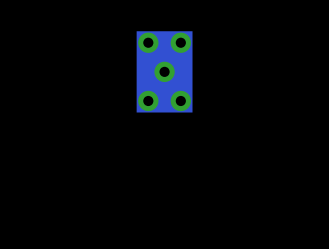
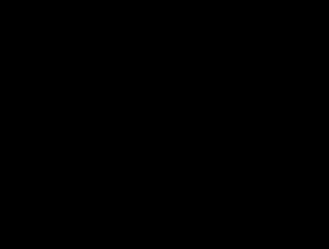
part: (164, 71) -> none

